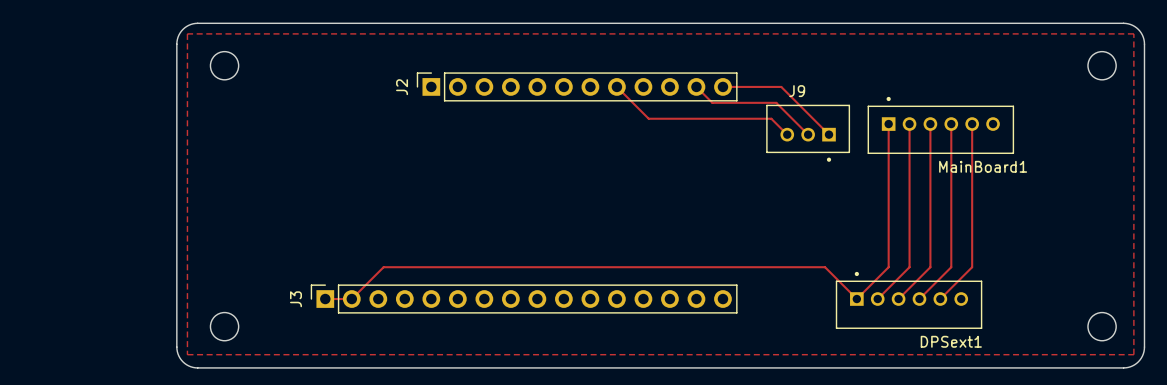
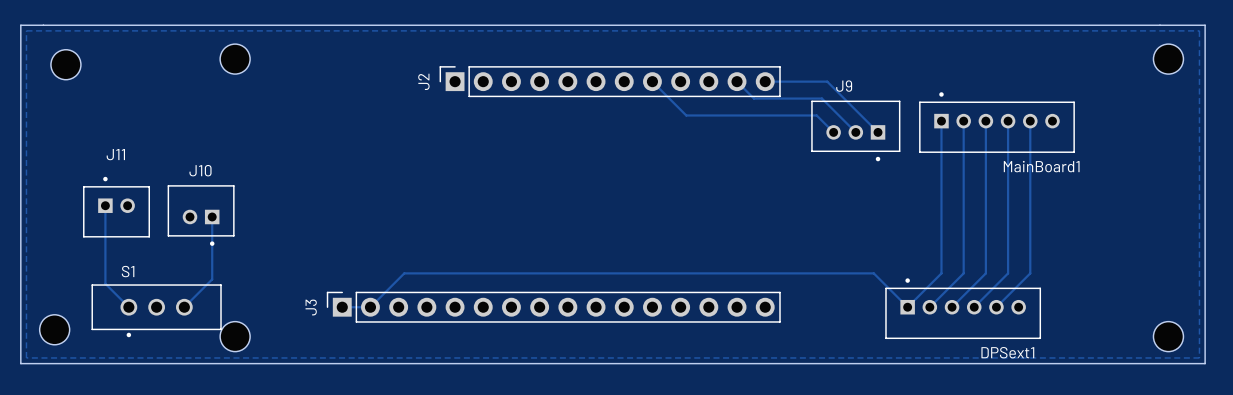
board edge: (197, 23) (1130, 24) (1141, 33) (1144, 44) (1143, 353) (1134, 364) (1123, 367) (190, 366) (181, 360) (176, 347) (176, 44) (178, 37) (182, 29) (190, 24) (197, 23) -> (20, 25) (20, 363) (1205, 363) (1205, 25) (20, 25)
zone outline: (187, 33) (187, 354) (1133, 354) (1133, 33) (187, 33) -> (26, 30) (26, 357) (1199, 357) (1199, 30) (26, 30)
part: none -> (65, 64)
track: none -> (105, 205) (105, 283) (128, 307)
J11: none -> (116, 207)
J10: none -> (201, 215)
track: none -> (212, 216) (212, 279) (184, 307)
S1: none -> (156, 310)
part: none -> (54, 329)

